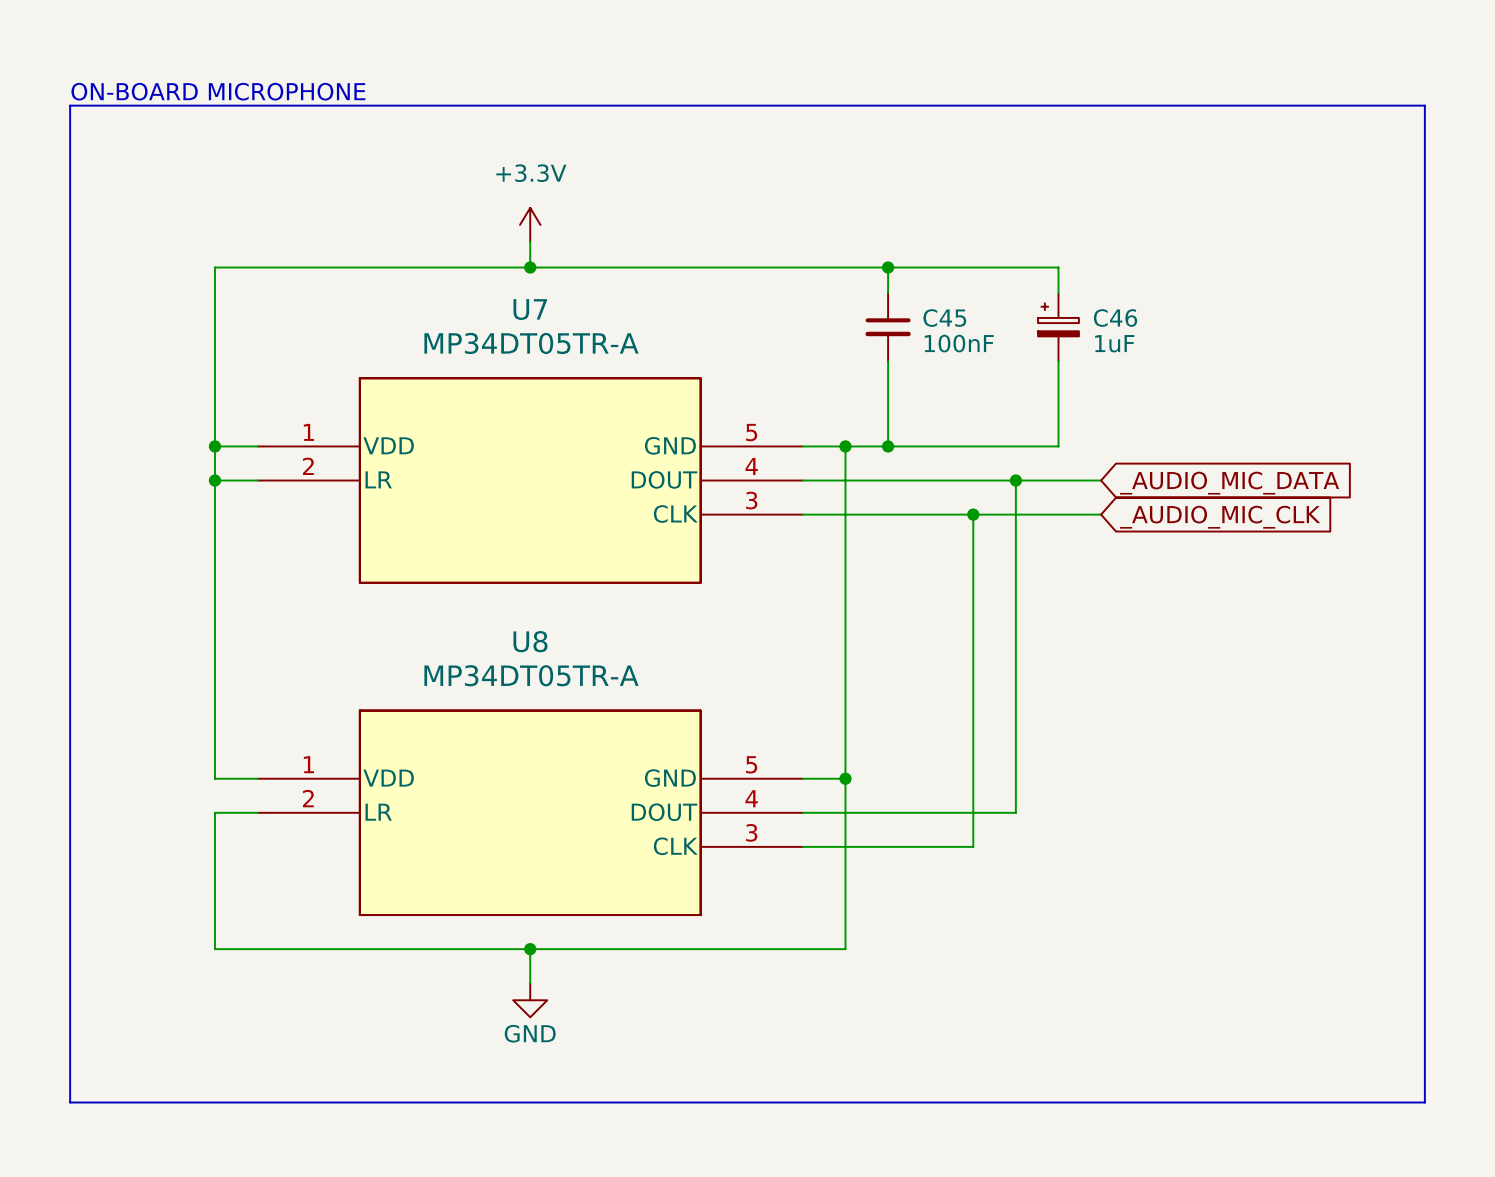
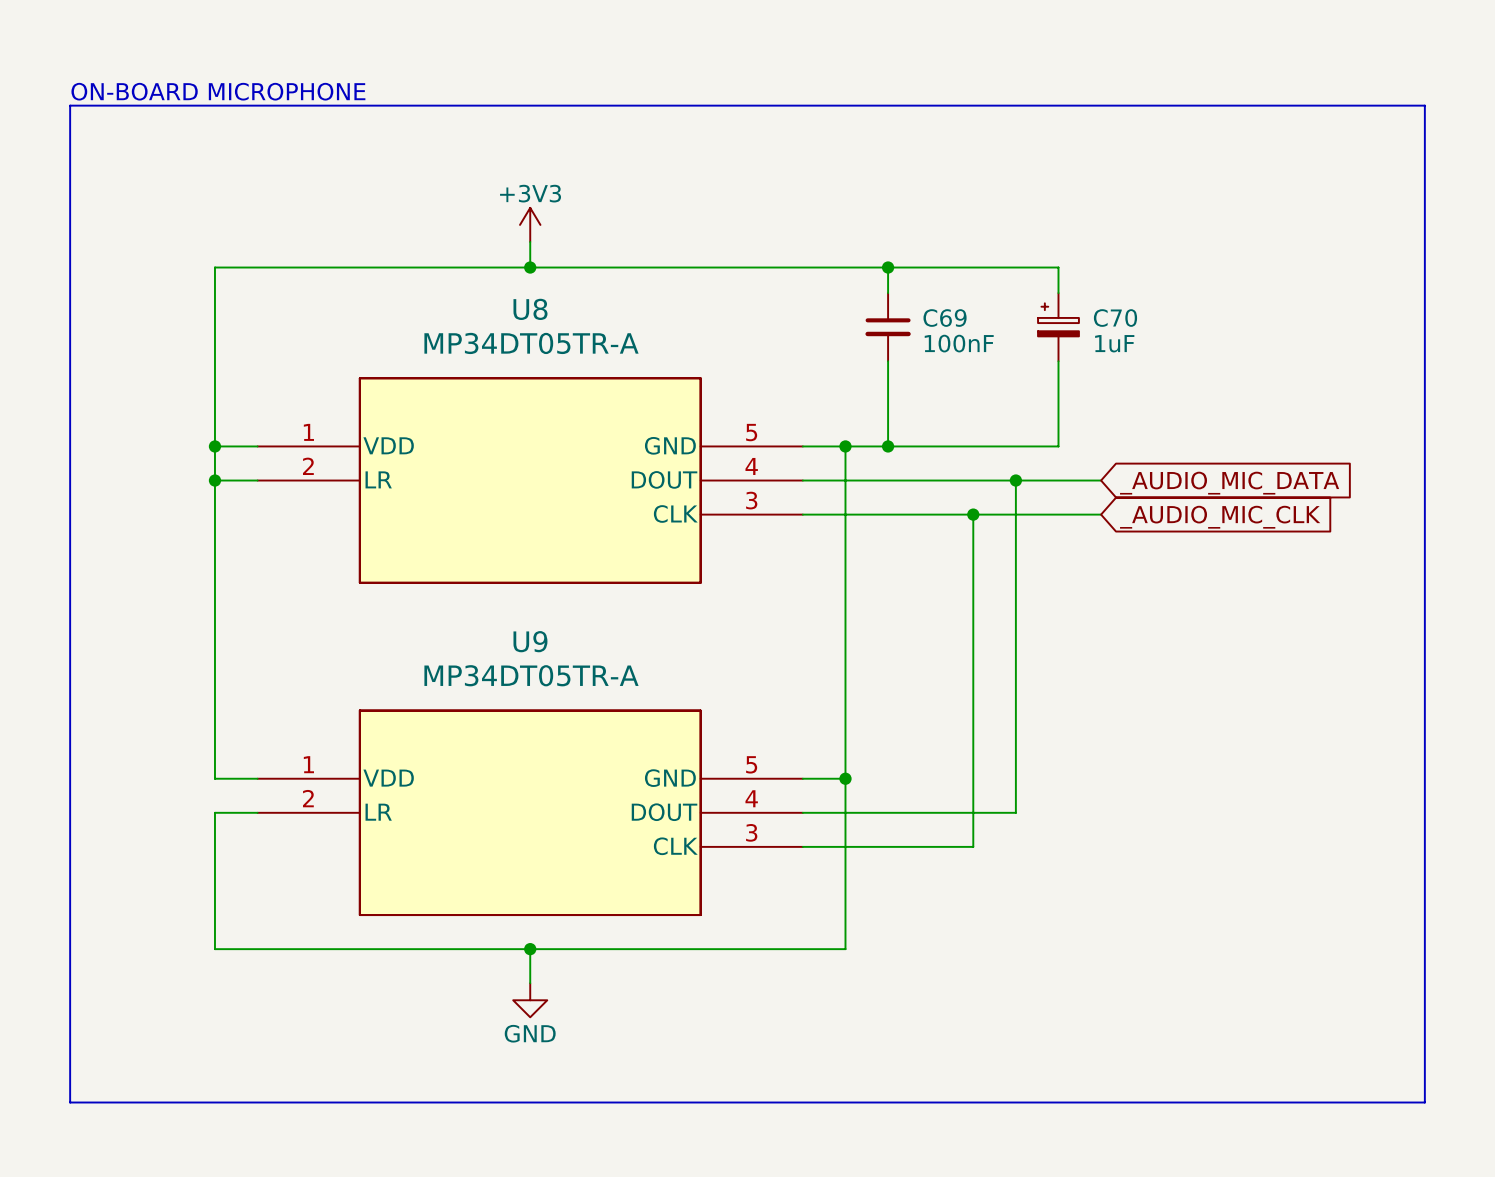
power symbol: +3.3V (530, 224) -> +3V3 (530, 224)
U7 name: U7 (530, 309) -> U8 (530, 309)
C45 name: C45 (944, 318) -> C69 (945, 318)
C46 name: C46 (1115, 318) -> C70 (1115, 318)
U8 name: U8 (530, 641) -> U9 (530, 641)

